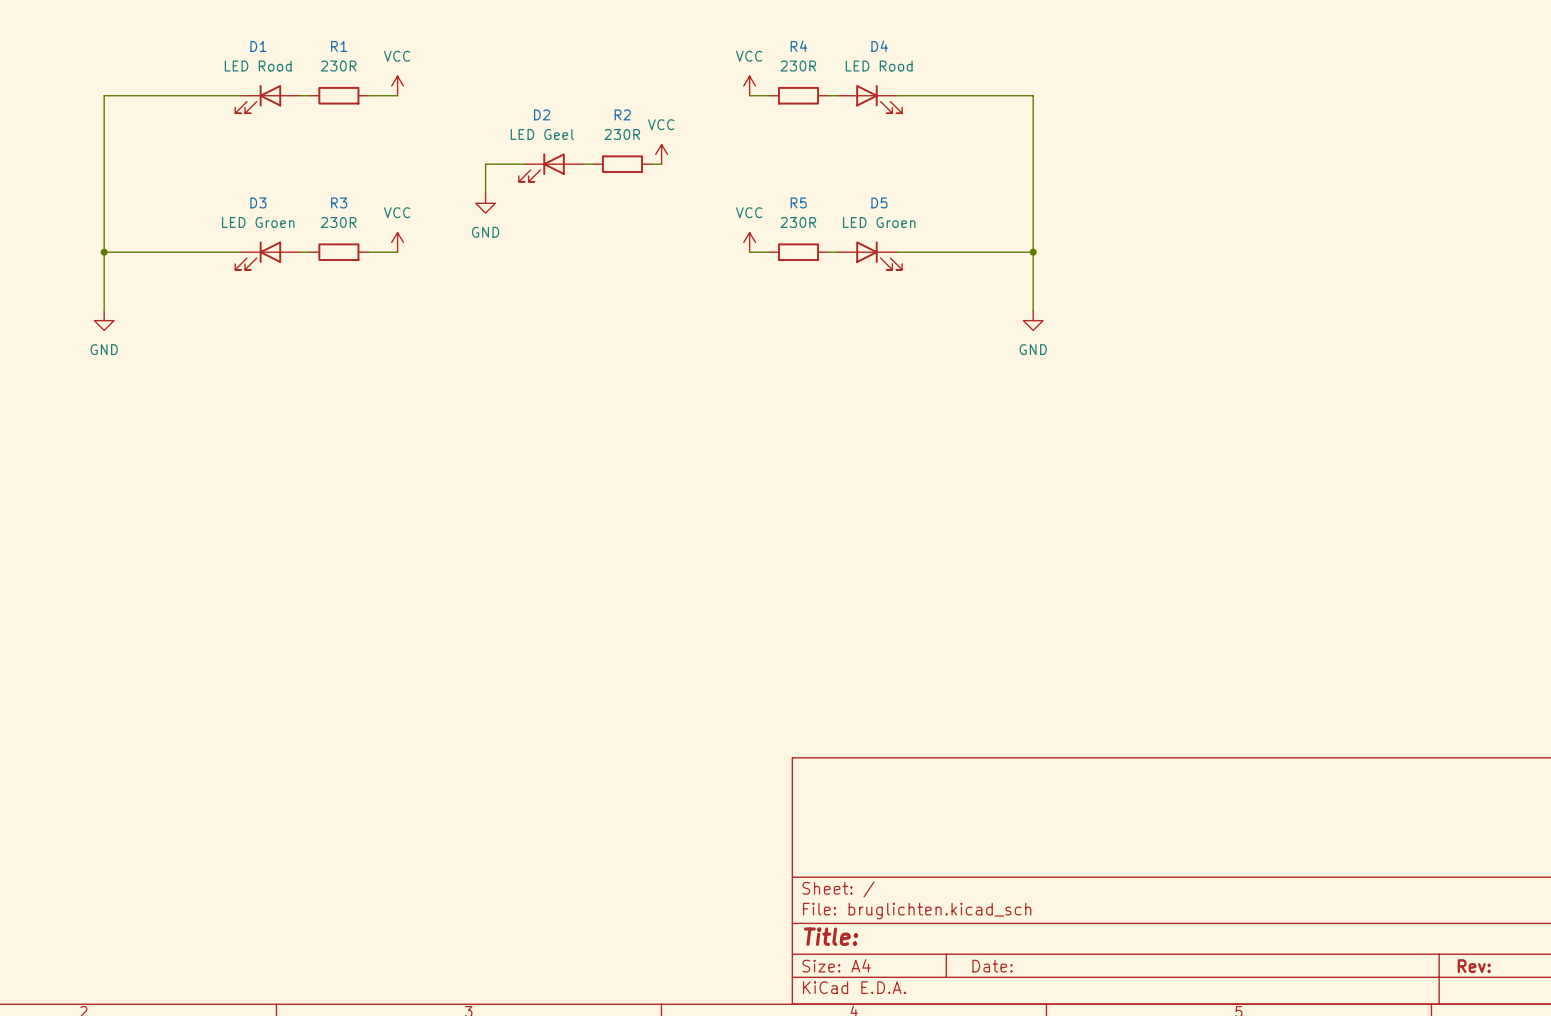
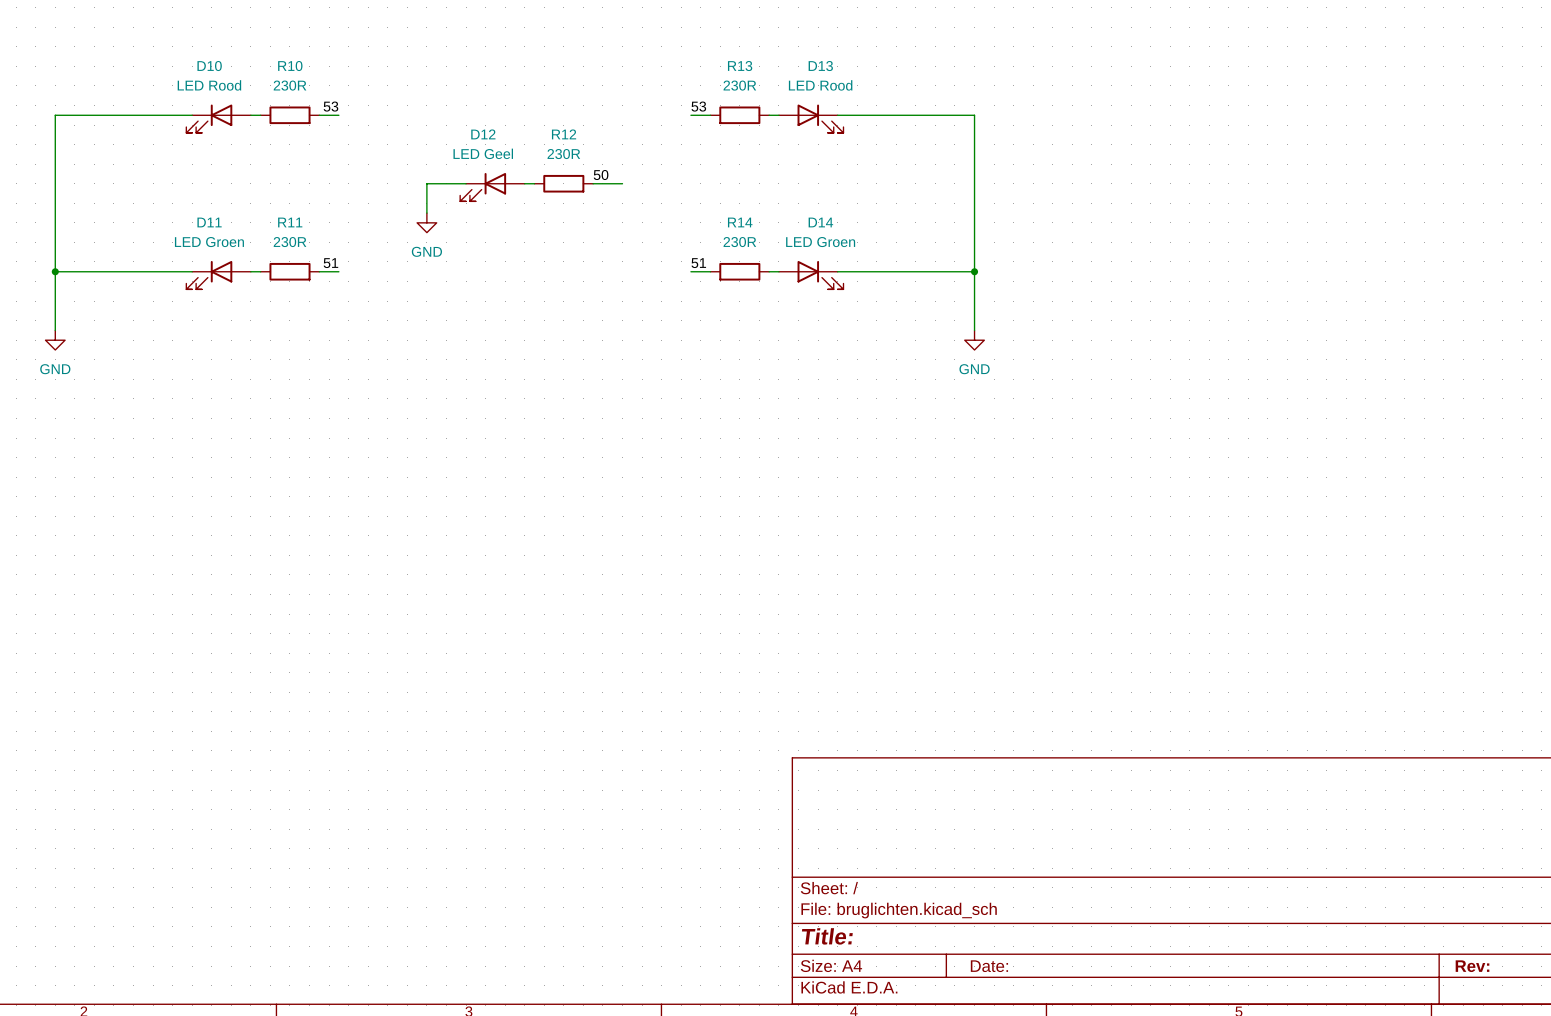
power symbol: VCC (397, 85) -> none
power symbol: VCC (749, 85) -> none
wire: (241, 95) (104, 95) (104, 310) -> (192, 115) (55, 115) (55, 330)
wire: (299, 95) (309, 95) -> (250, 115) (260, 115)
R1: 230R (338, 95) -> none
wire: (368, 95) (397, 95) -> none
wire: (749, 95) (769, 95) -> (690, 115) (710, 115)
R4: 230R (798, 95) -> none
wire: (827, 95) (837, 95) -> (769, 115) (778, 115)
wire: (896, 95) (1033, 95) (1033, 310) -> (837, 115) (974, 115) (974, 330)
D1: LED Rood (267, 99) -> none
D4: LED Rood (869, 99) -> none
label: none -> 53 (330, 106)
label: none -> 53 (698, 106)
R10: none -> 230R (289, 115)
wire: none -> (319, 115) (338, 115)
R13: none -> 230R (739, 115)
D10: none -> LED Rood (218, 118)
D13: none -> LED Rood (811, 118)
power symbol: VCC (661, 154) -> none
wire: (524, 164) (485, 164) (485, 193) -> (466, 183) (426, 183) (426, 213)
wire: (583, 164) (593, 164) -> (524, 183) (534, 183)
R2: 230R (622, 164) -> none
wire: (651, 164) (661, 164) -> none
D2: LED Geel (551, 167) -> none
label: none -> 50 (601, 175)
R12: none -> 230R (563, 183)
wire: none -> (593, 183) (622, 183)
D12: none -> LED Geel (492, 187)
power symbol position: GND (485, 203) -> GND (426, 222)
power symbol: VCC (397, 242) -> none
power symbol: VCC (749, 242) -> none
wire: (104, 252) (241, 252) -> (55, 271) (192, 271)
junction: (104, 252) -> none
wire: (299, 252) (309, 252) -> (250, 271) (260, 271)
R3: 230R (338, 252) -> none
wire: (368, 252) (397, 252) -> none
wire: (749, 252) (769, 252) -> (690, 271) (710, 271)
R5: 230R (798, 252) -> none
wire: (827, 252) (837, 252) -> (769, 271) (778, 271)
wire: (896, 252) (1033, 252) -> (837, 271) (974, 271)
junction: (1033, 252) -> none
D3: LED Groen (267, 255) -> none
D5: LED Groen (869, 255) -> none
label: none -> 51 (330, 263)
label: none -> 51 (698, 263)
junction: none -> (55, 271)
R11: none -> 230R (289, 271)
wire: none -> (319, 271) (338, 271)
R14: none -> 230R (739, 271)
junction: none -> (974, 271)
D11: none -> LED Groen (218, 275)
D14: none -> LED Groen (811, 275)
power symbol position: GND (104, 320) -> GND (55, 340)
power symbol position: GND (1033, 320) -> GND (974, 340)

